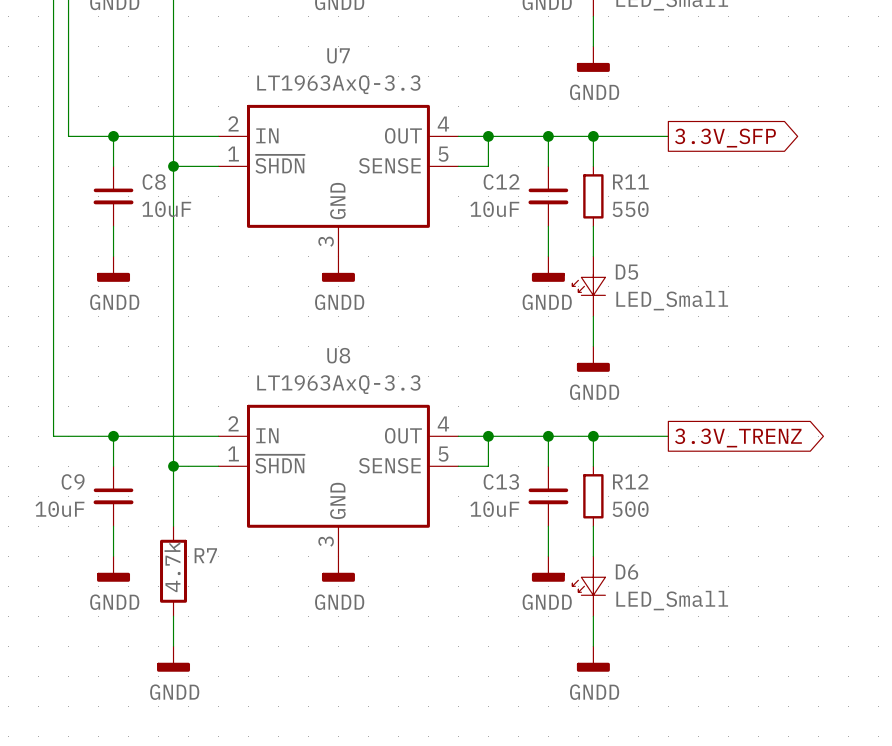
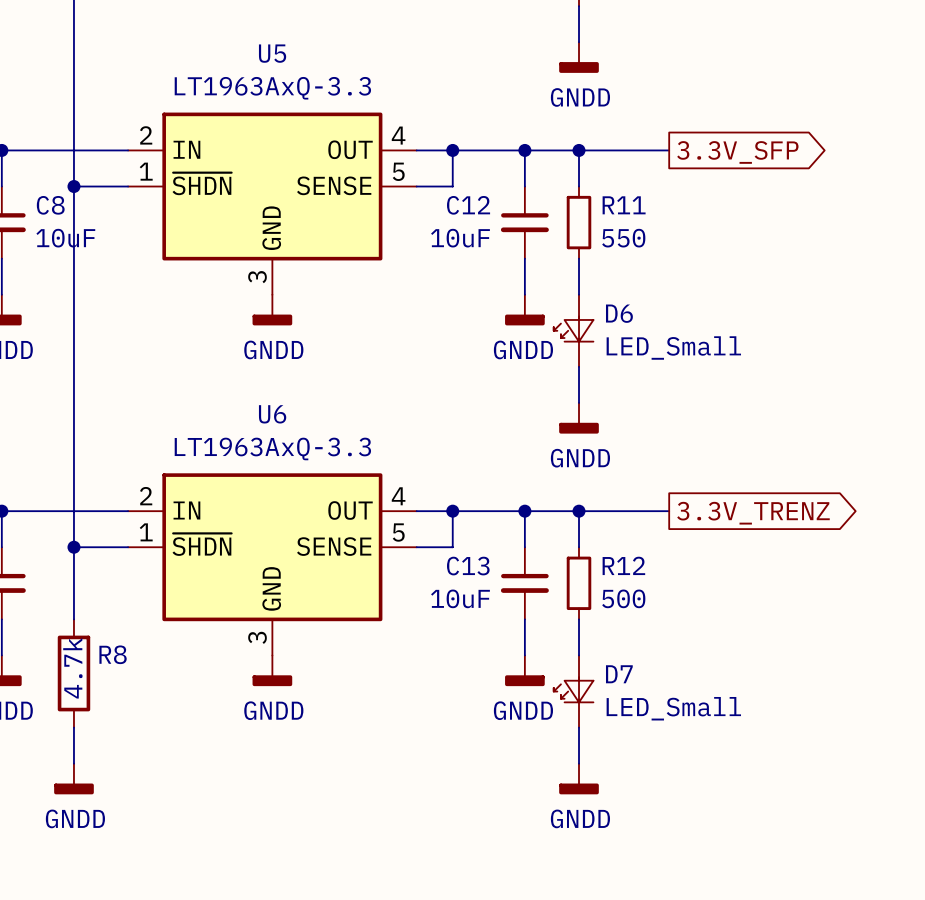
U7 name: U7 (338, 55) -> U5 (272, 53)
D5 name: D5 (626, 272) -> D6 (619, 313)
U8 name: U8 (338, 355) -> U6 (272, 414)
R7 name: R7 (205, 555) -> R8 (113, 654)
D6 name: D6 (627, 572) -> D7 (619, 674)

